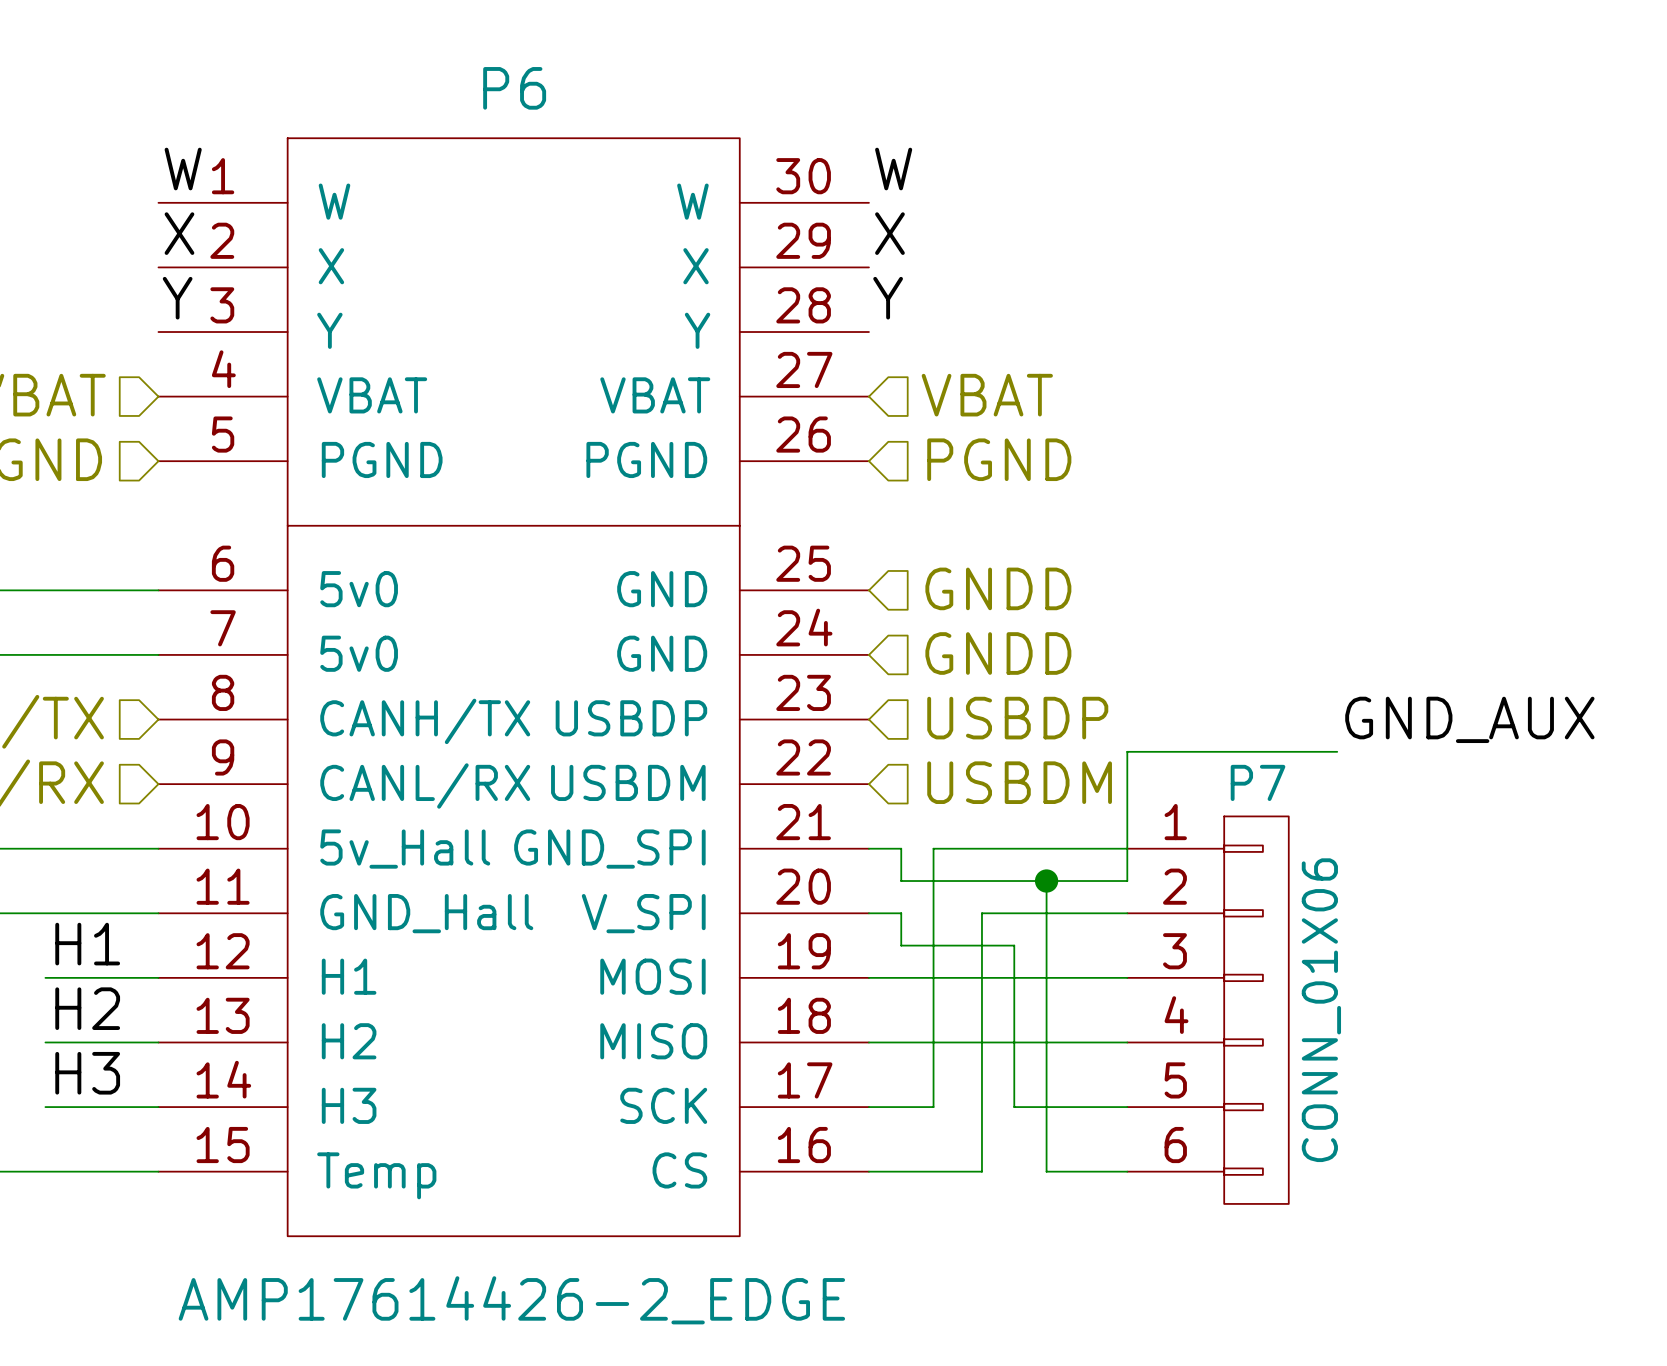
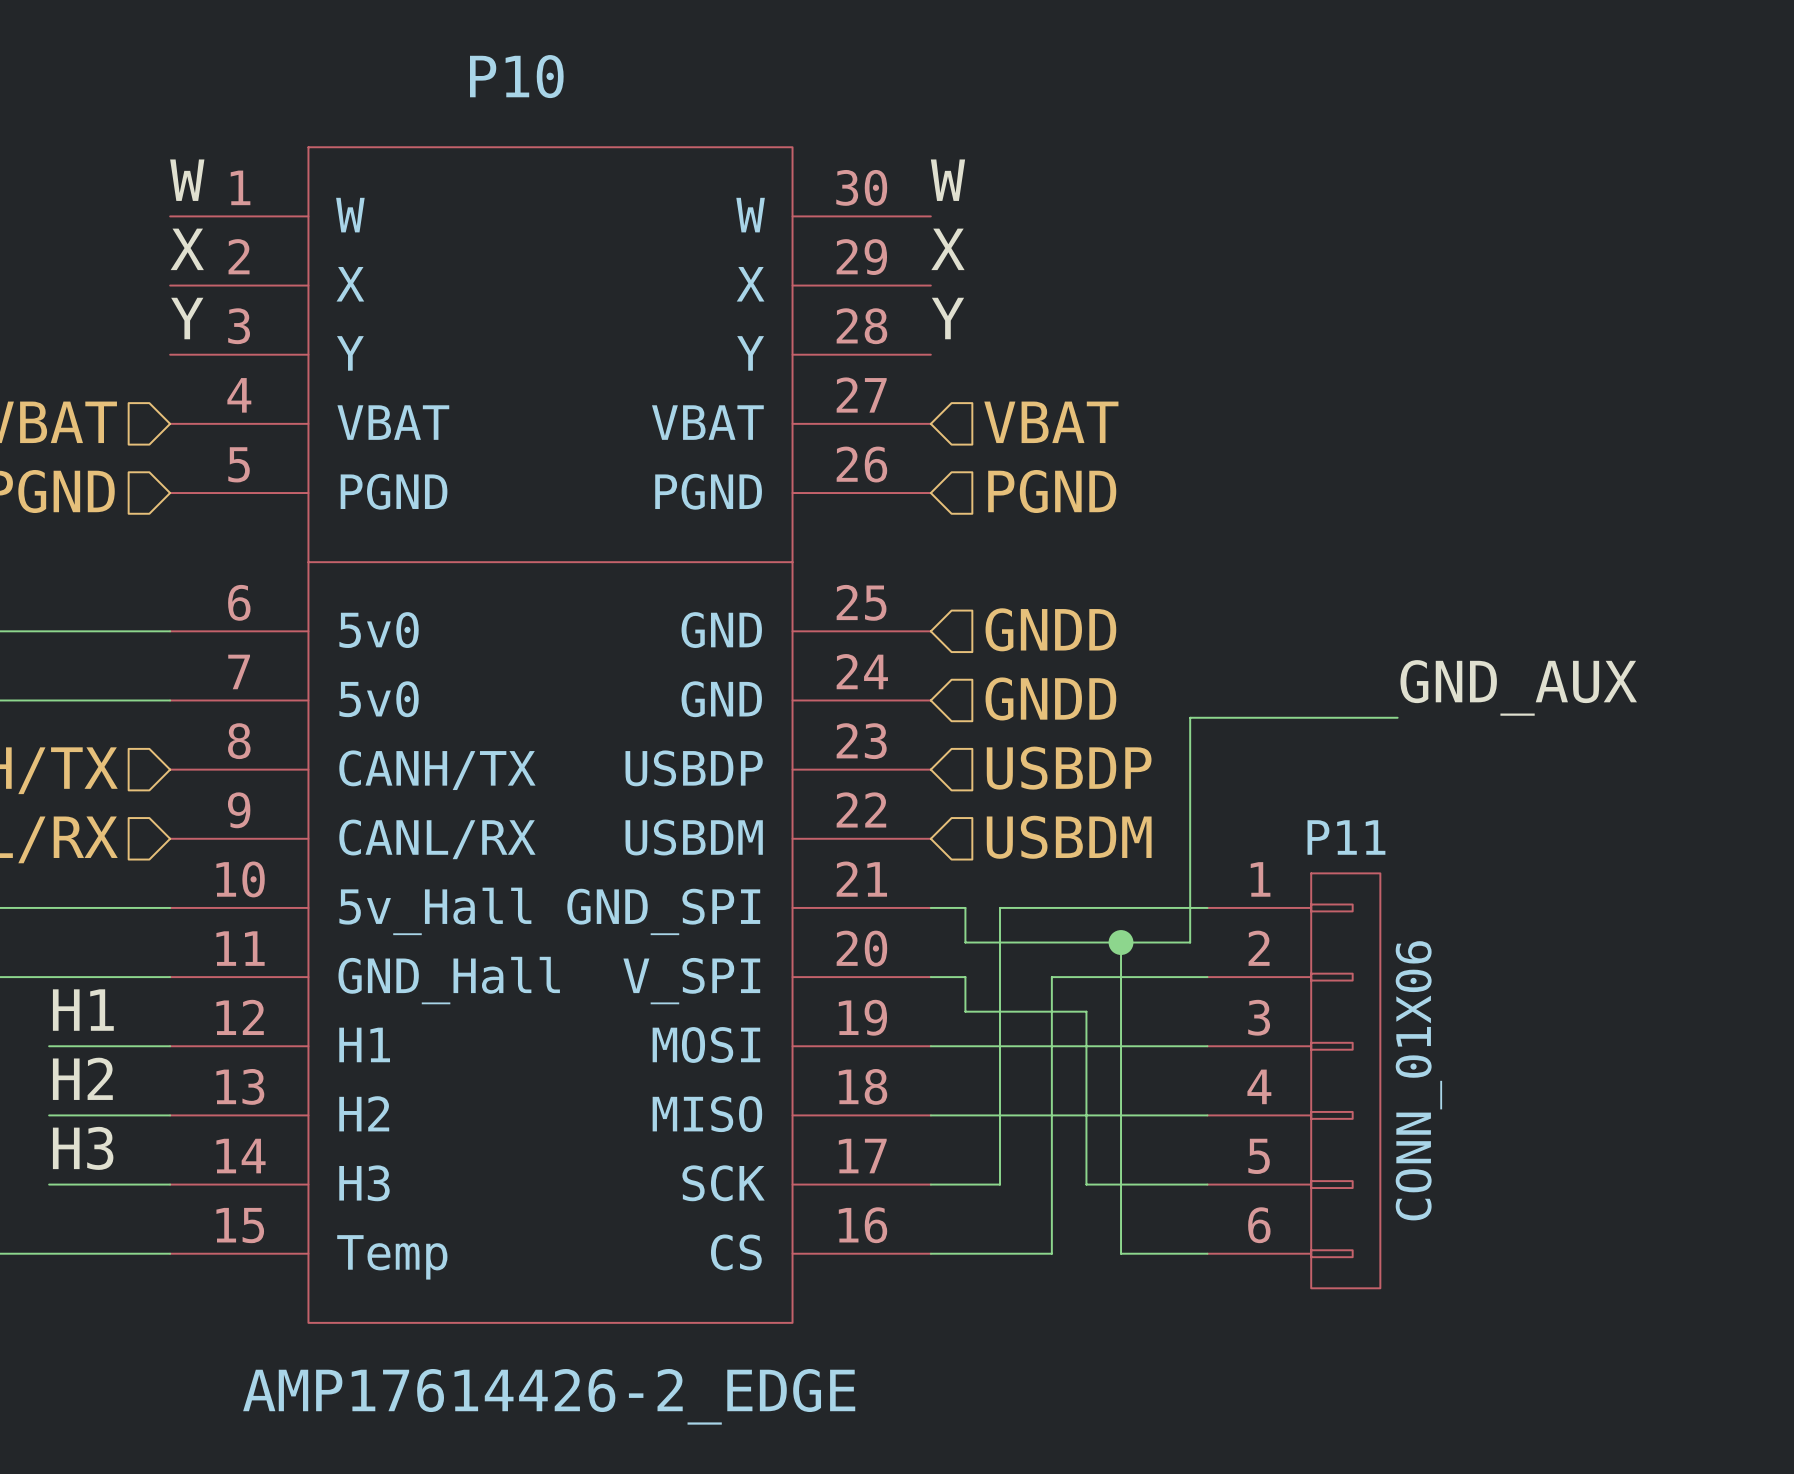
P6 name: P6 (514, 88) -> P10 (516, 76)
label position: GND_AUX (1469, 719) -> GND_AUX (1518, 687)
wire: (1337, 751) (1127, 751) (1127, 881) (1111, 881) -> (1397, 717) (1190, 717) (1190, 942)
P7 name: P7 (1258, 782) -> P11 (1346, 837)

